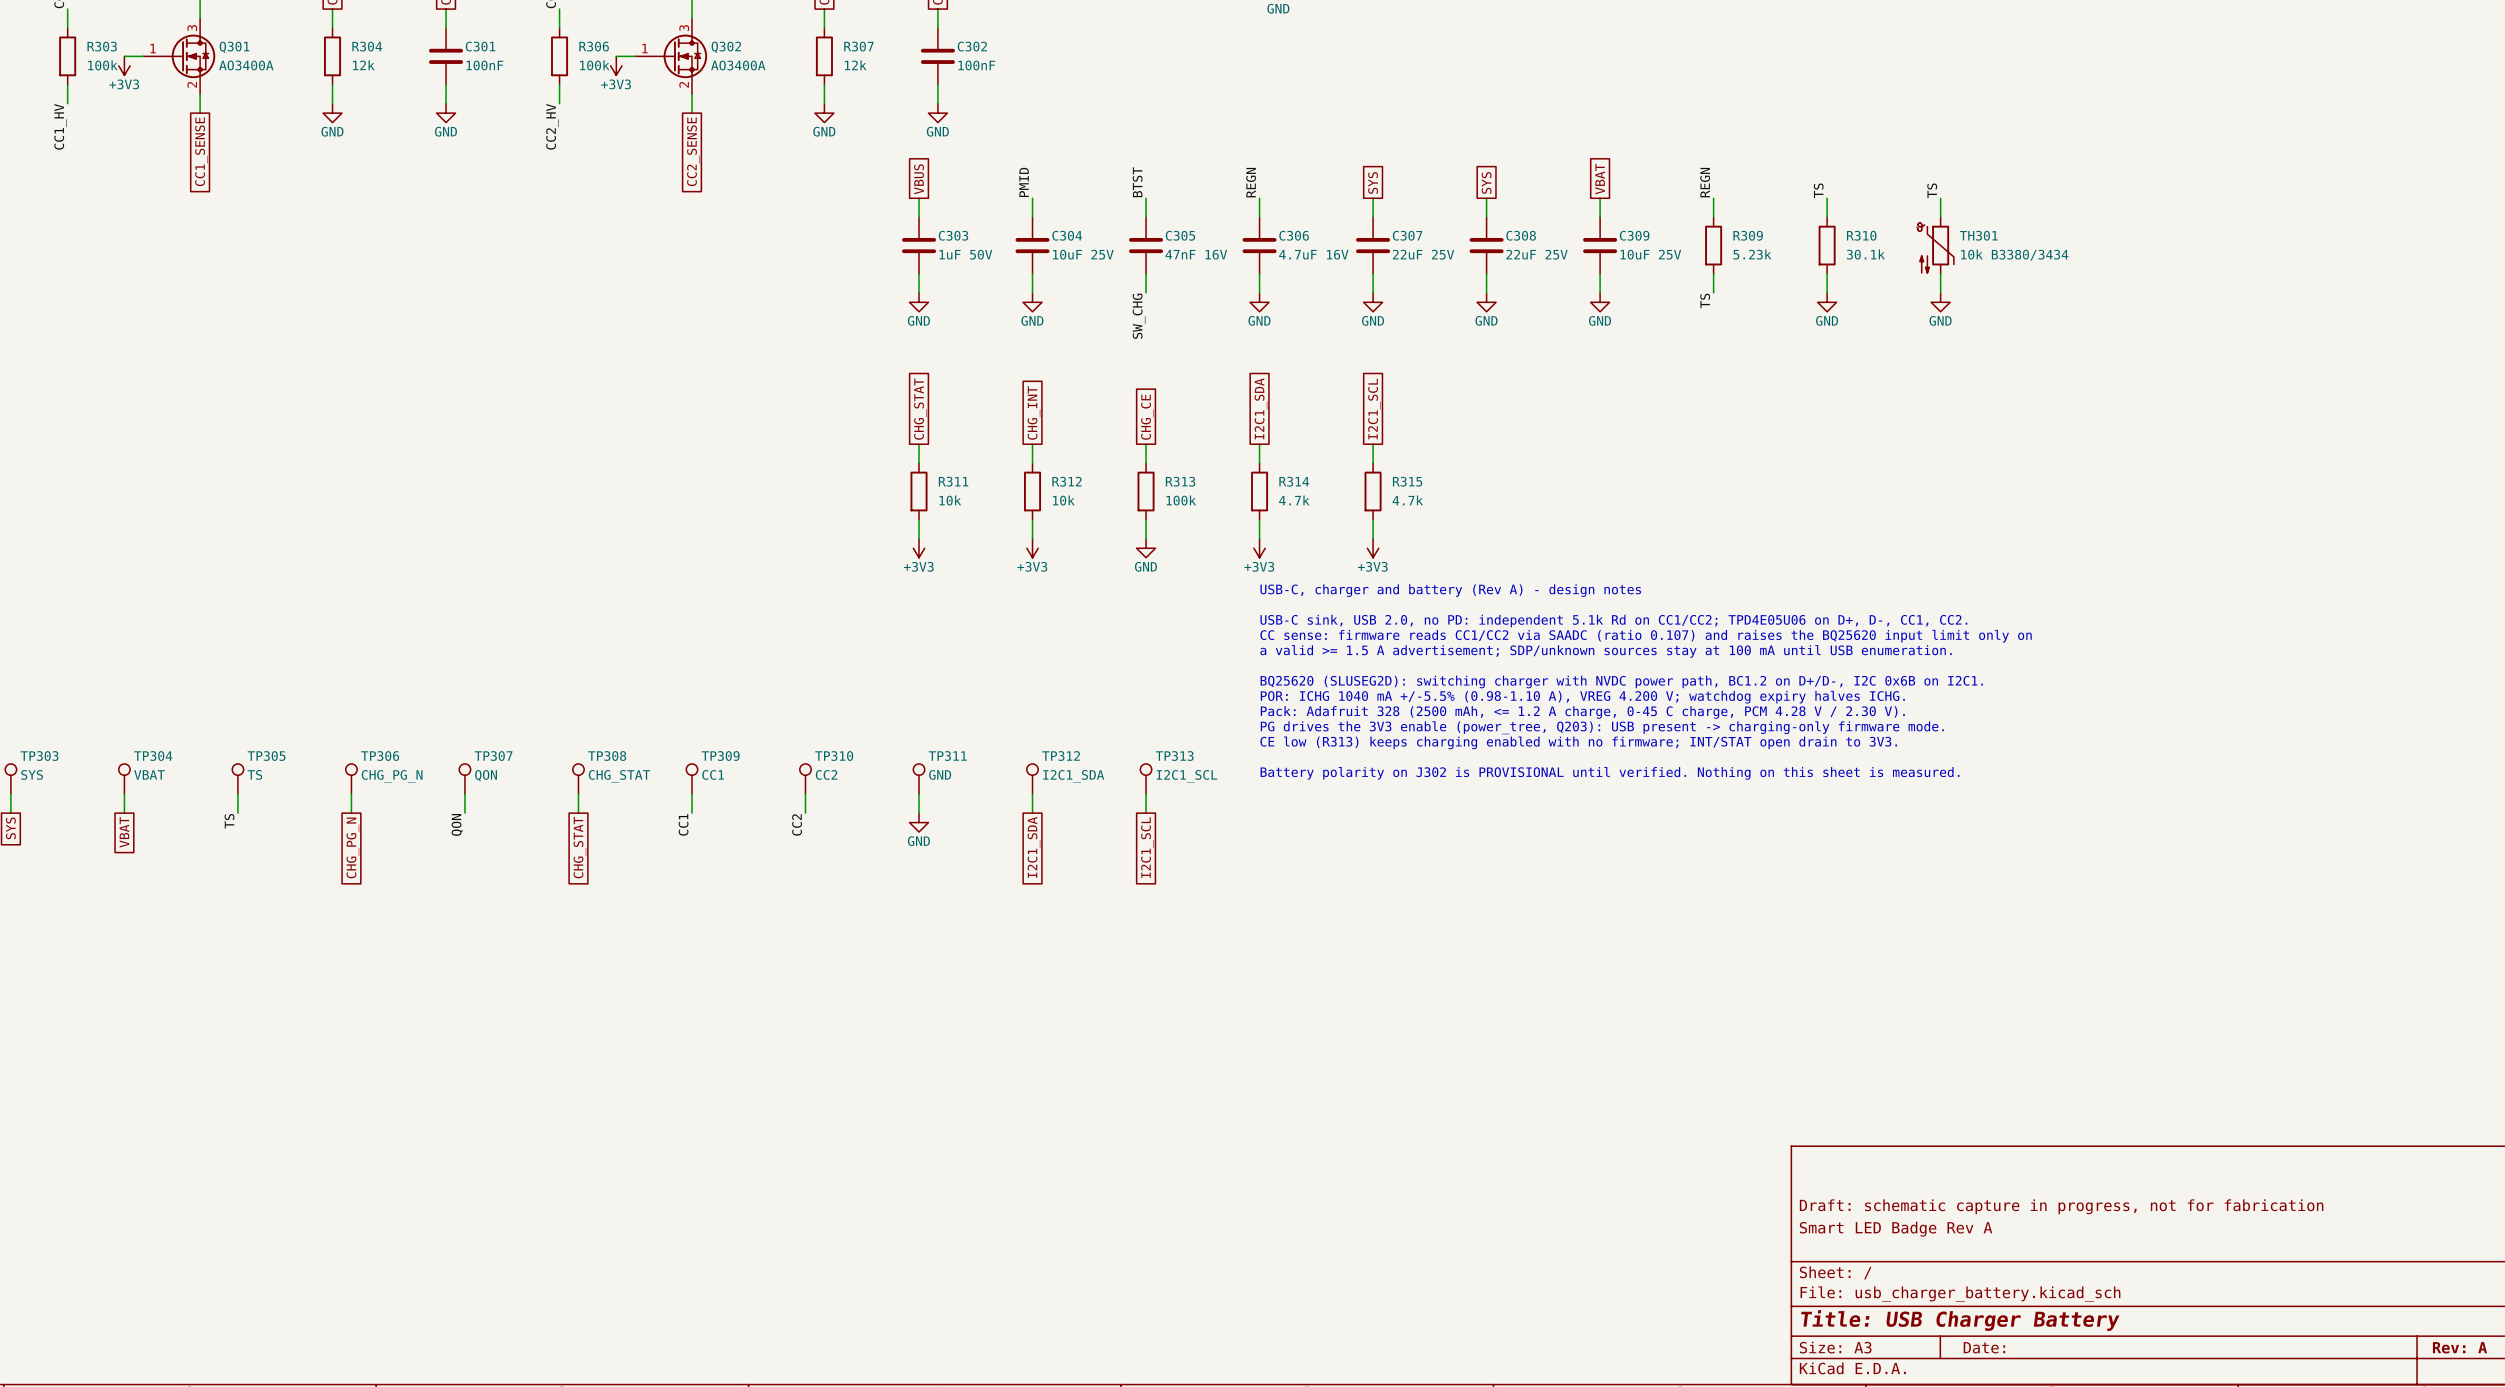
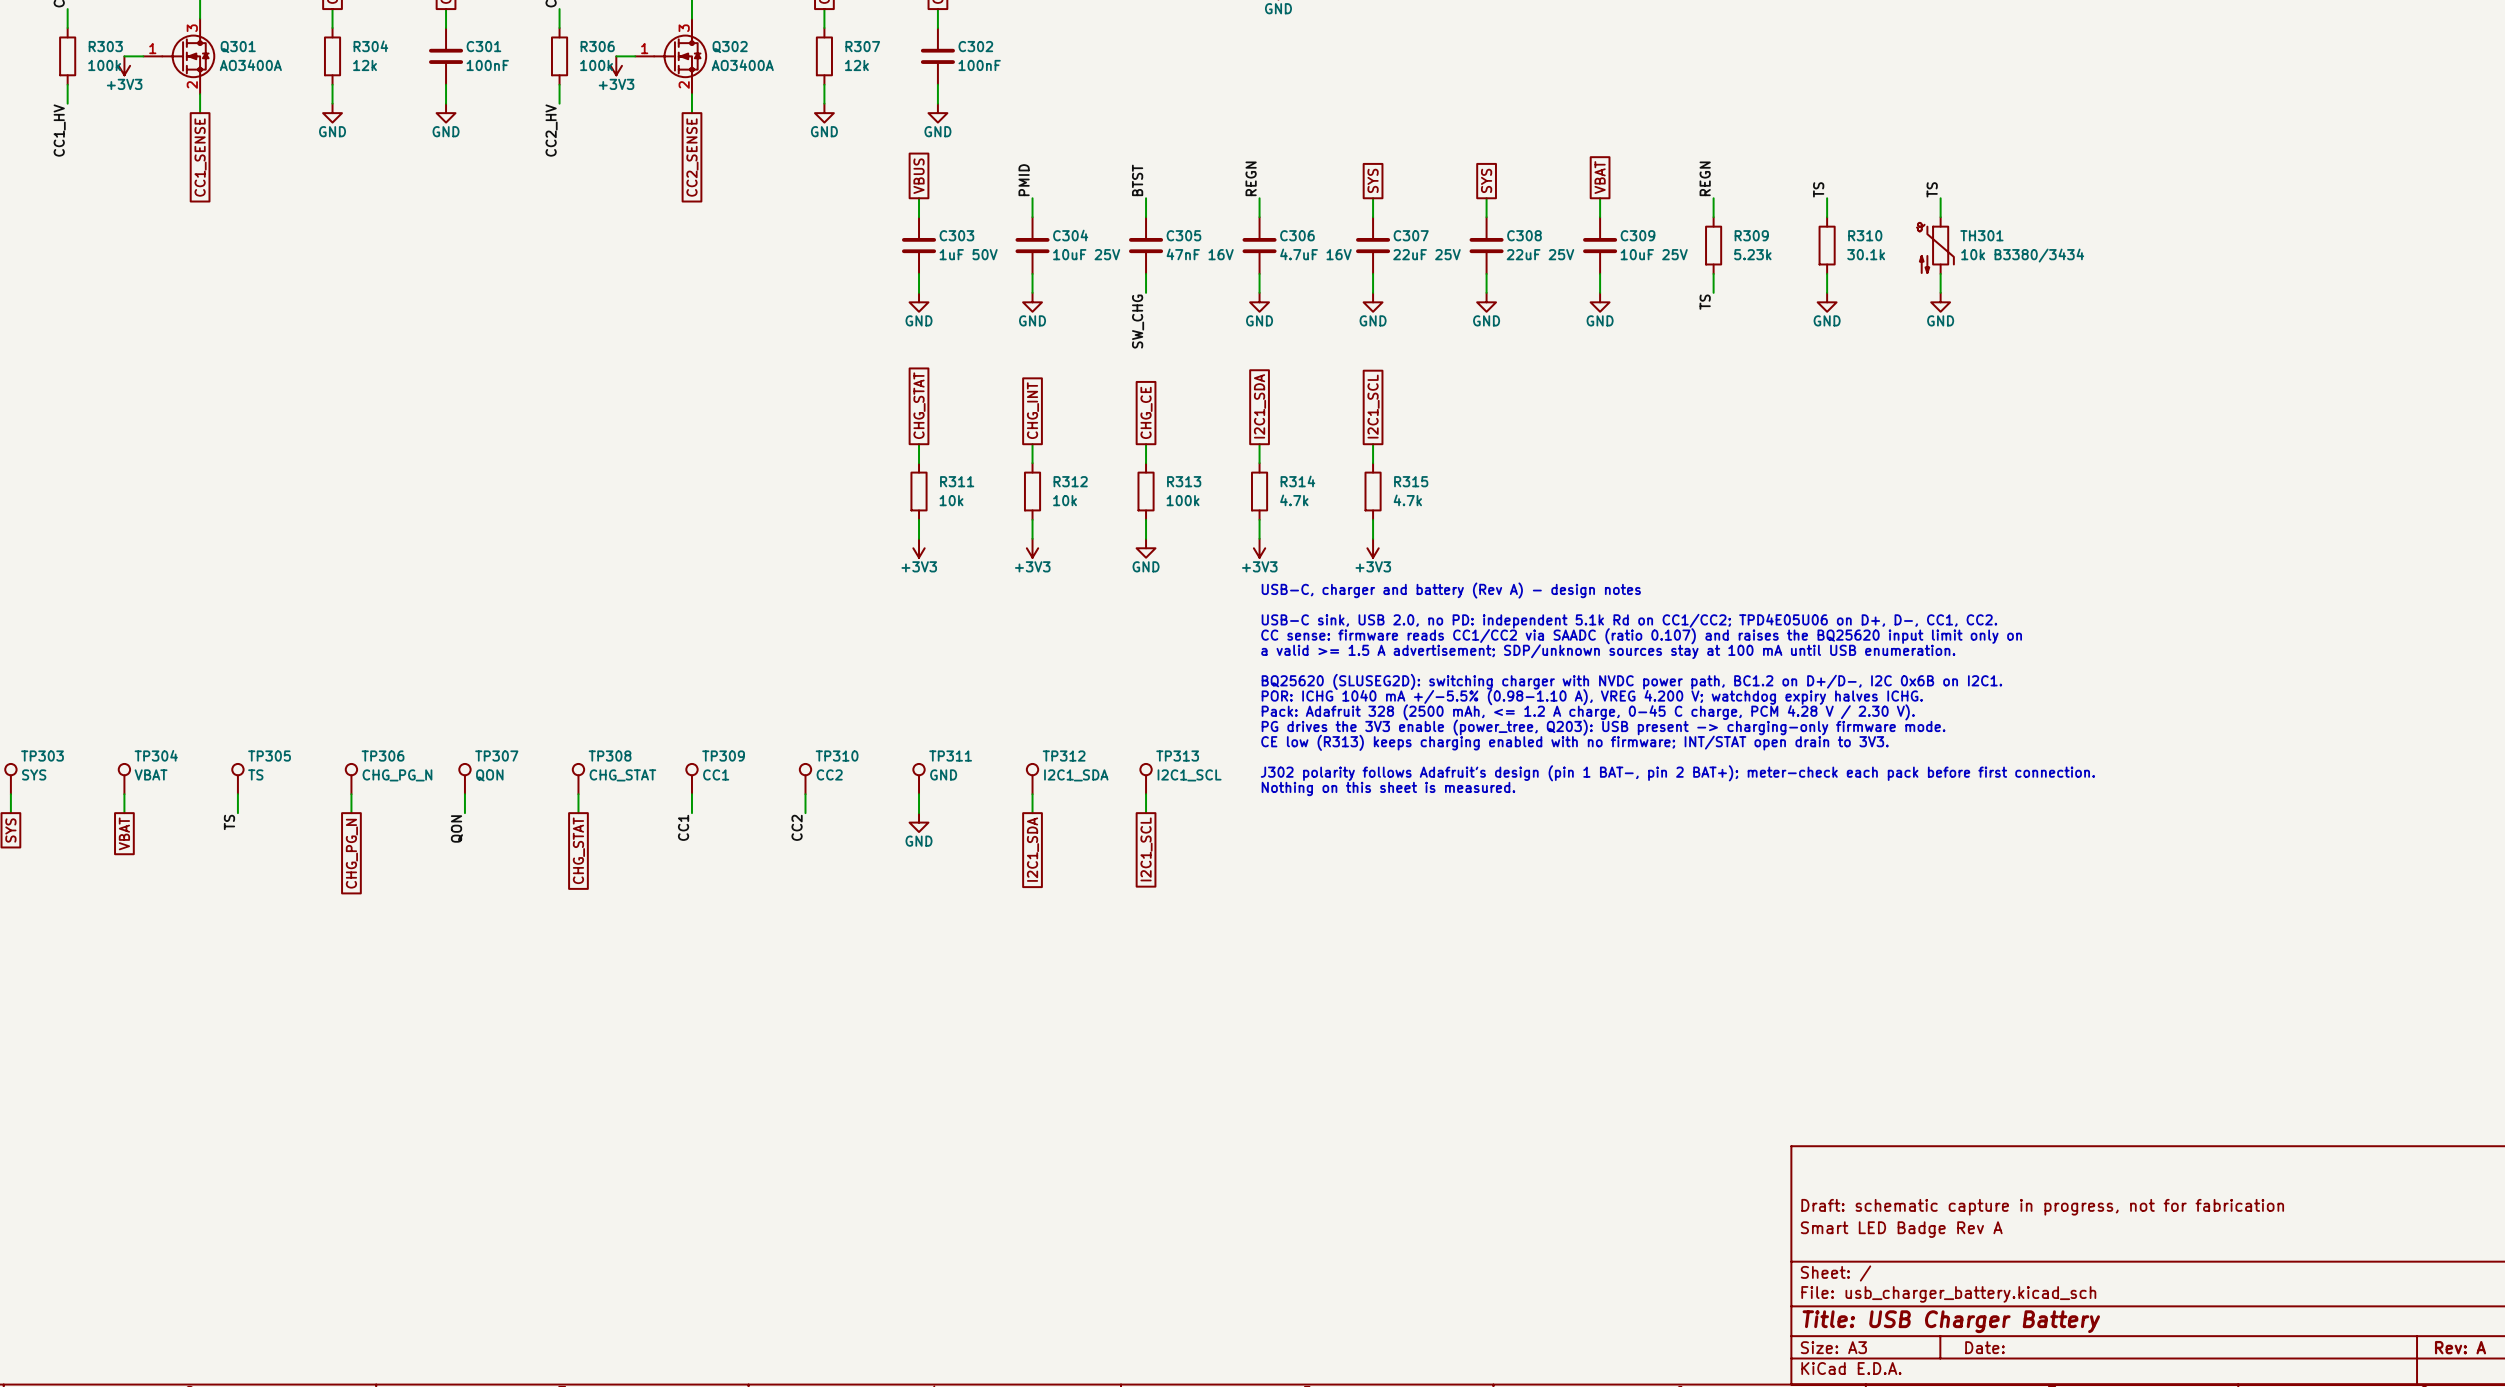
text: Battery polarity on J302 is PROVISIONAL until verified. Nothing on this sheet is measured. (1610, 773) -> J302 polarity follows Adafruit's design (pin 1 BAT-, pin 2 BAT+); meter-check each pack before first connection. (1677, 773)
text: none -> Nothing on this sheet is measured. (1388, 788)

